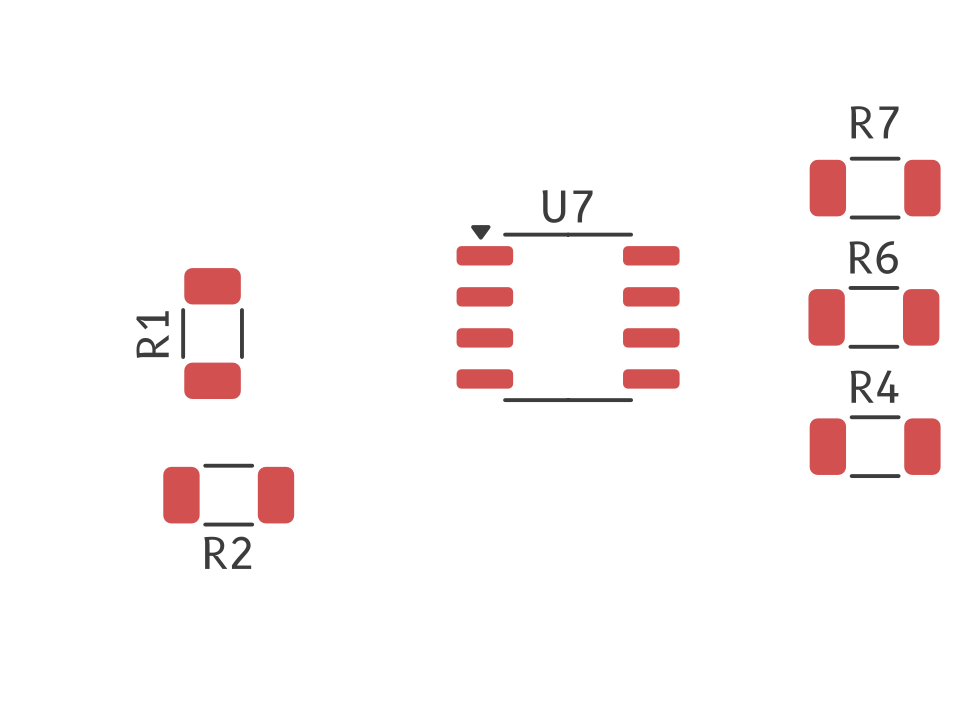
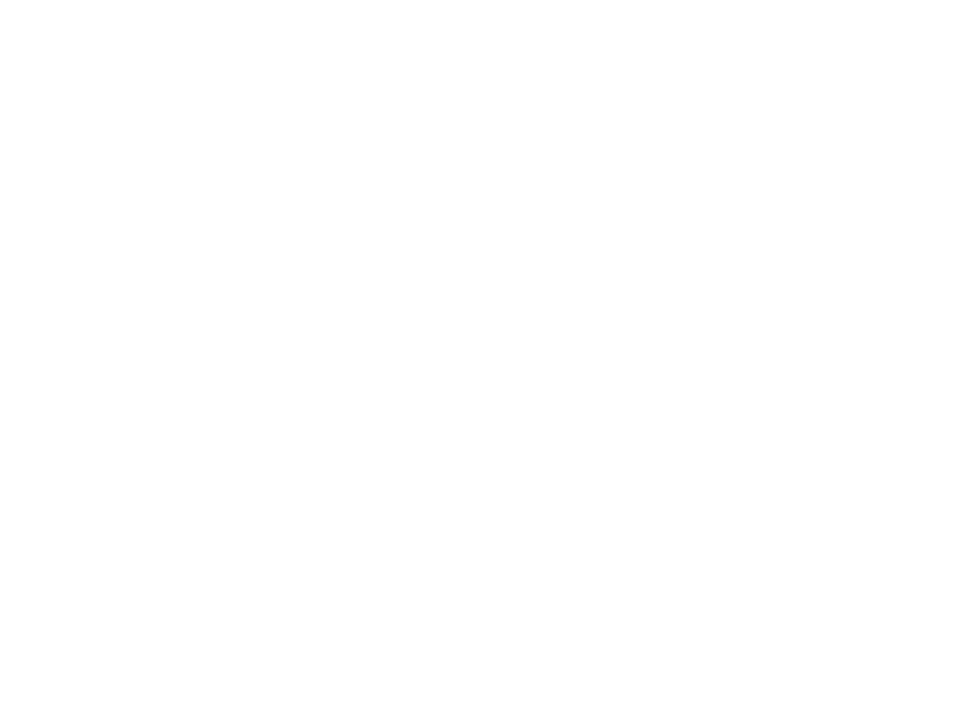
R7: (875, 188) -> none
U7: (568, 313) -> none
R6: (873, 317) -> none
R1: (212, 333) -> none
R4: (875, 446) -> none
R2: (228, 495) -> none

